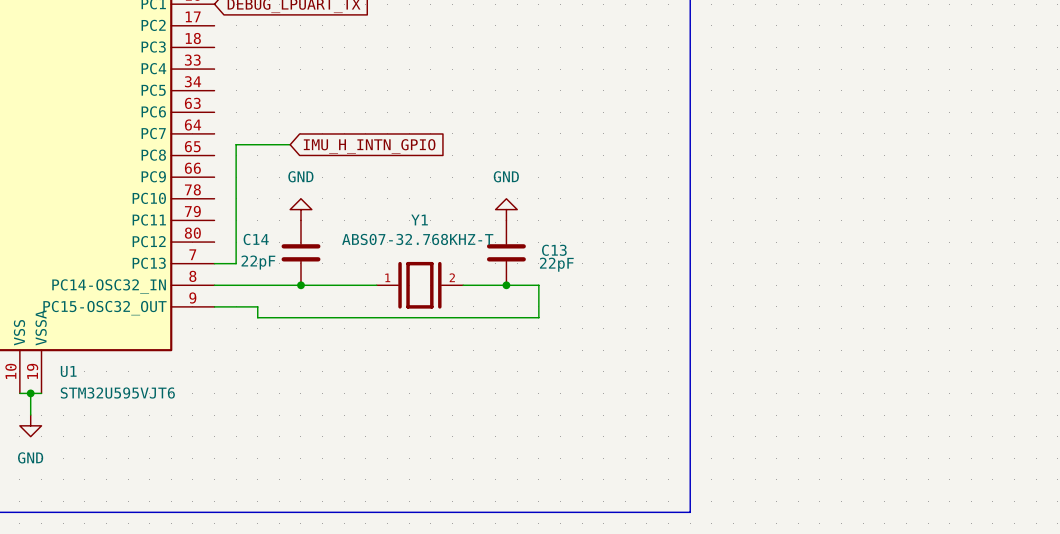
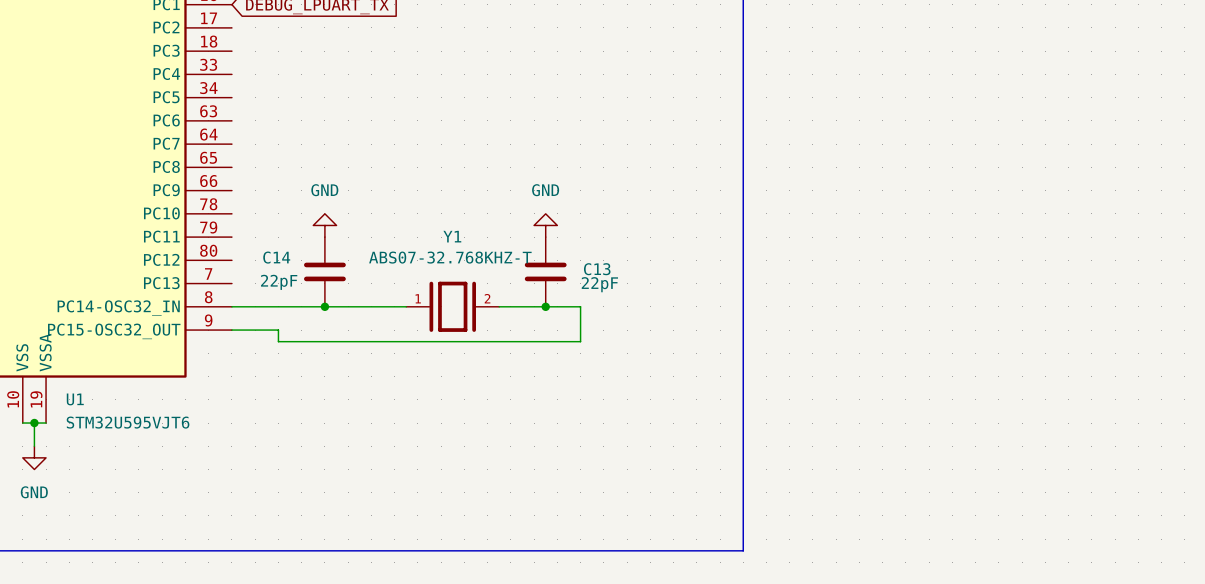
wire: (290, 144) (236, 144) (236, 263) (214, 263) -> none
global label: IMU_H_INTN_GPIO (369, 146) -> none

